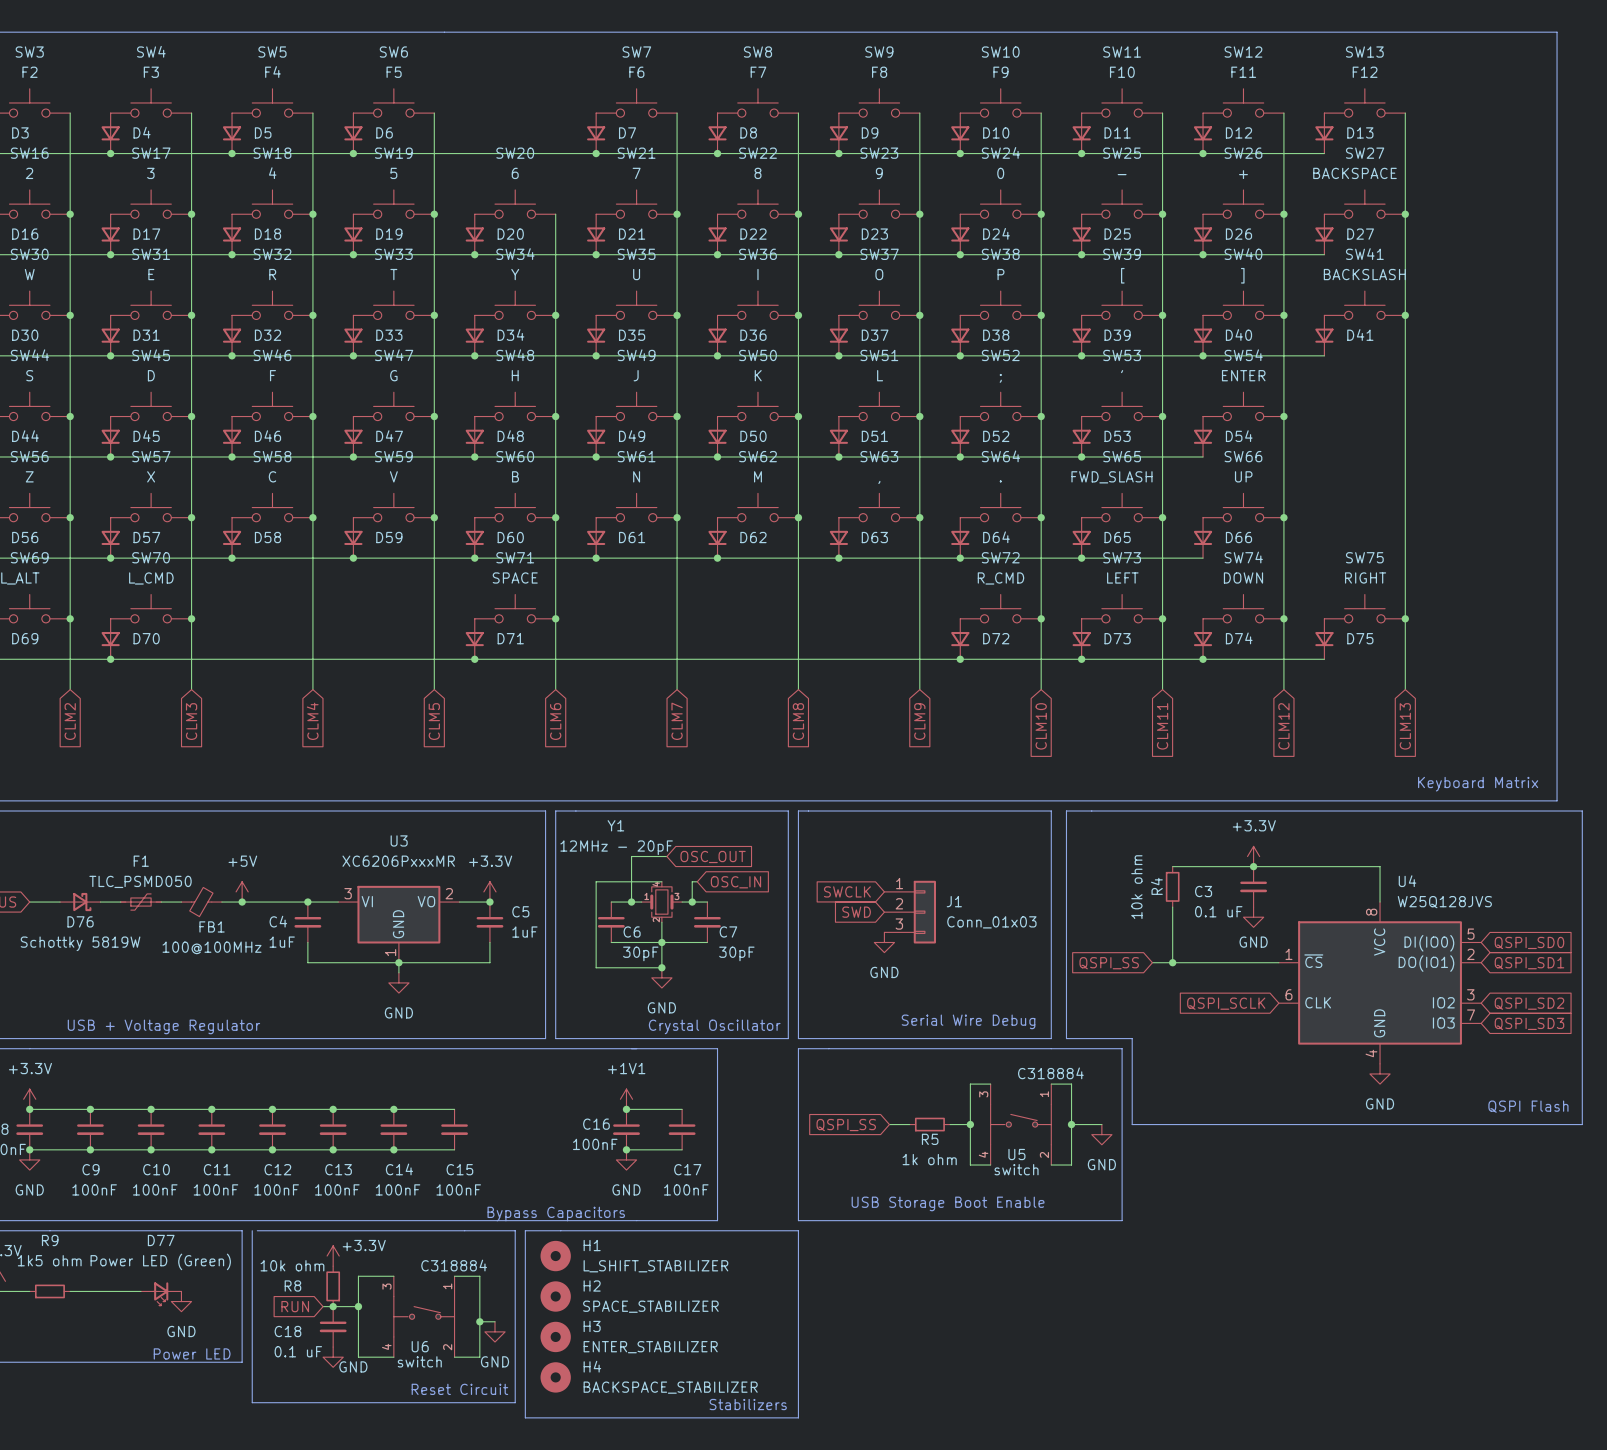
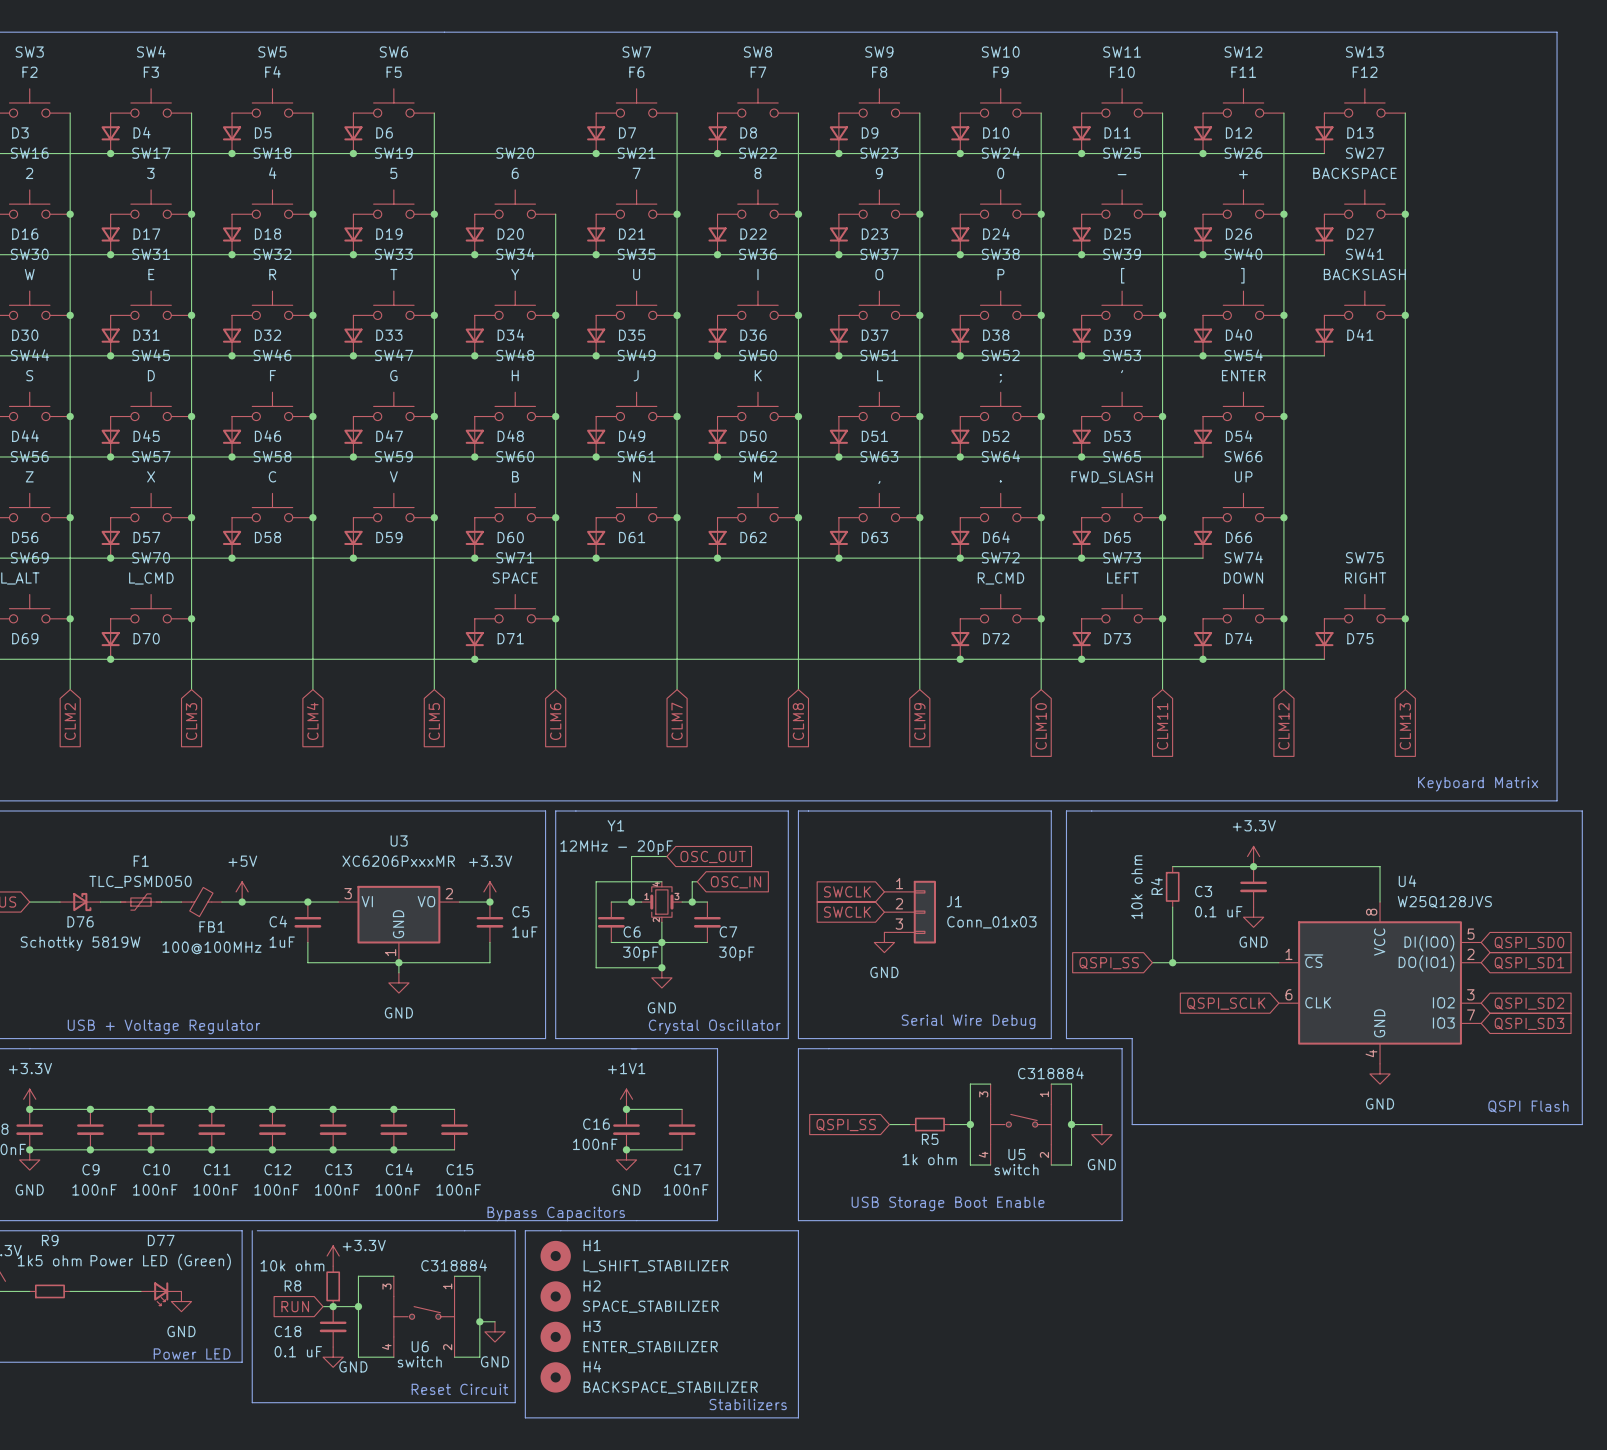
global label: SWD (856, 912) -> SWCLK (847, 912)

